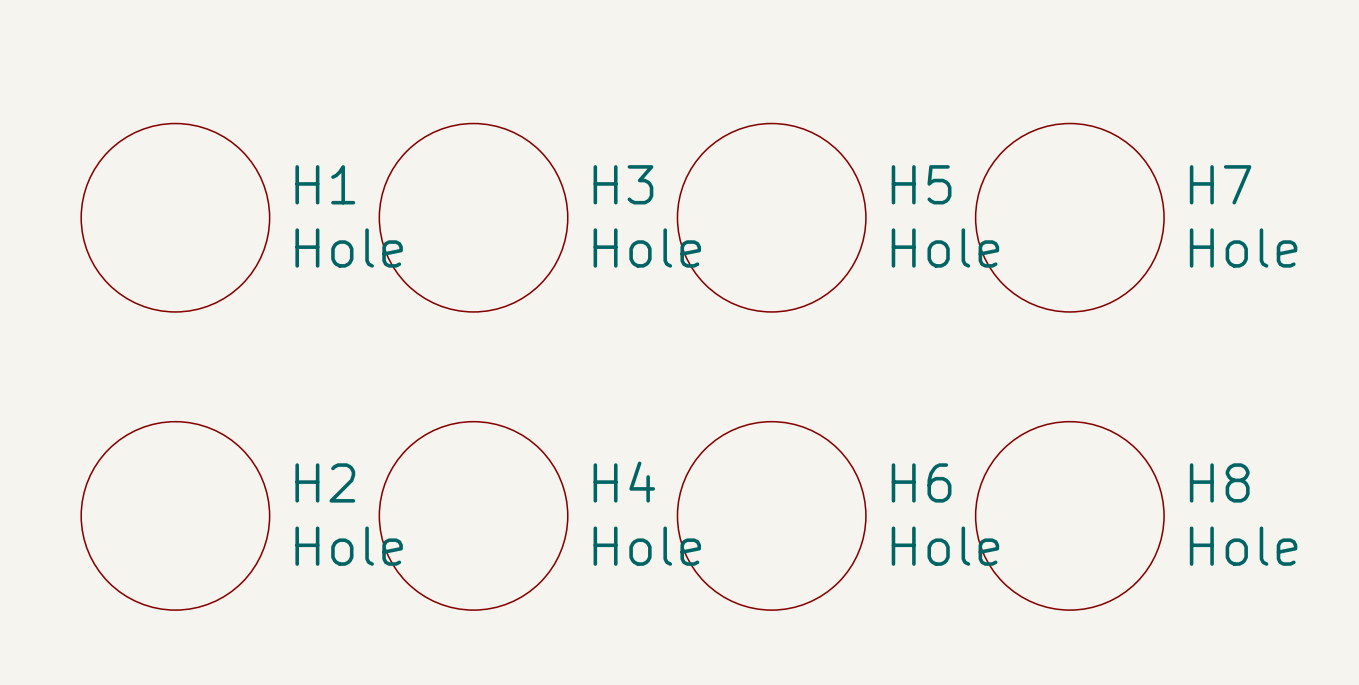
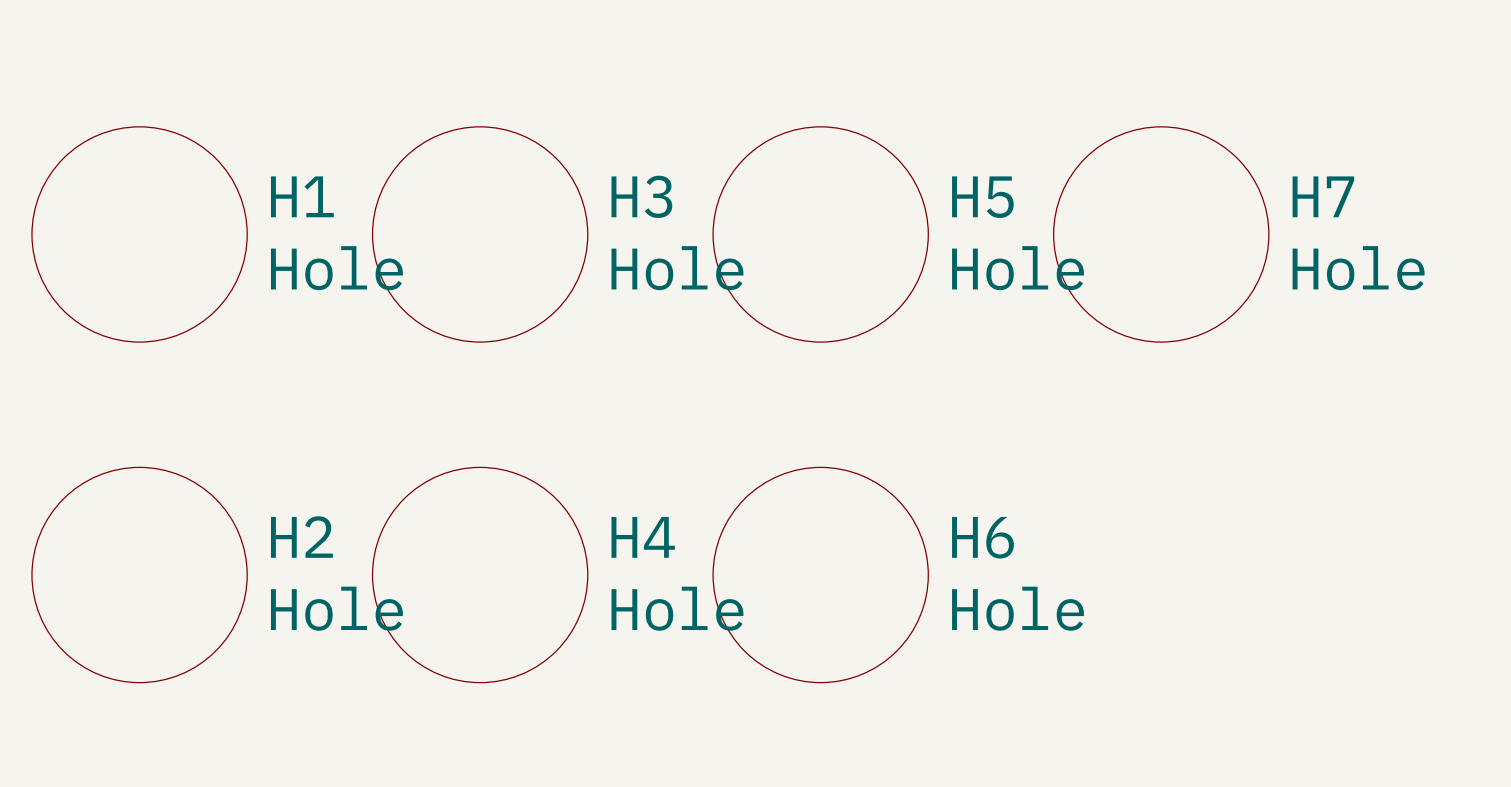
H8: Hole (1069, 515) -> none

